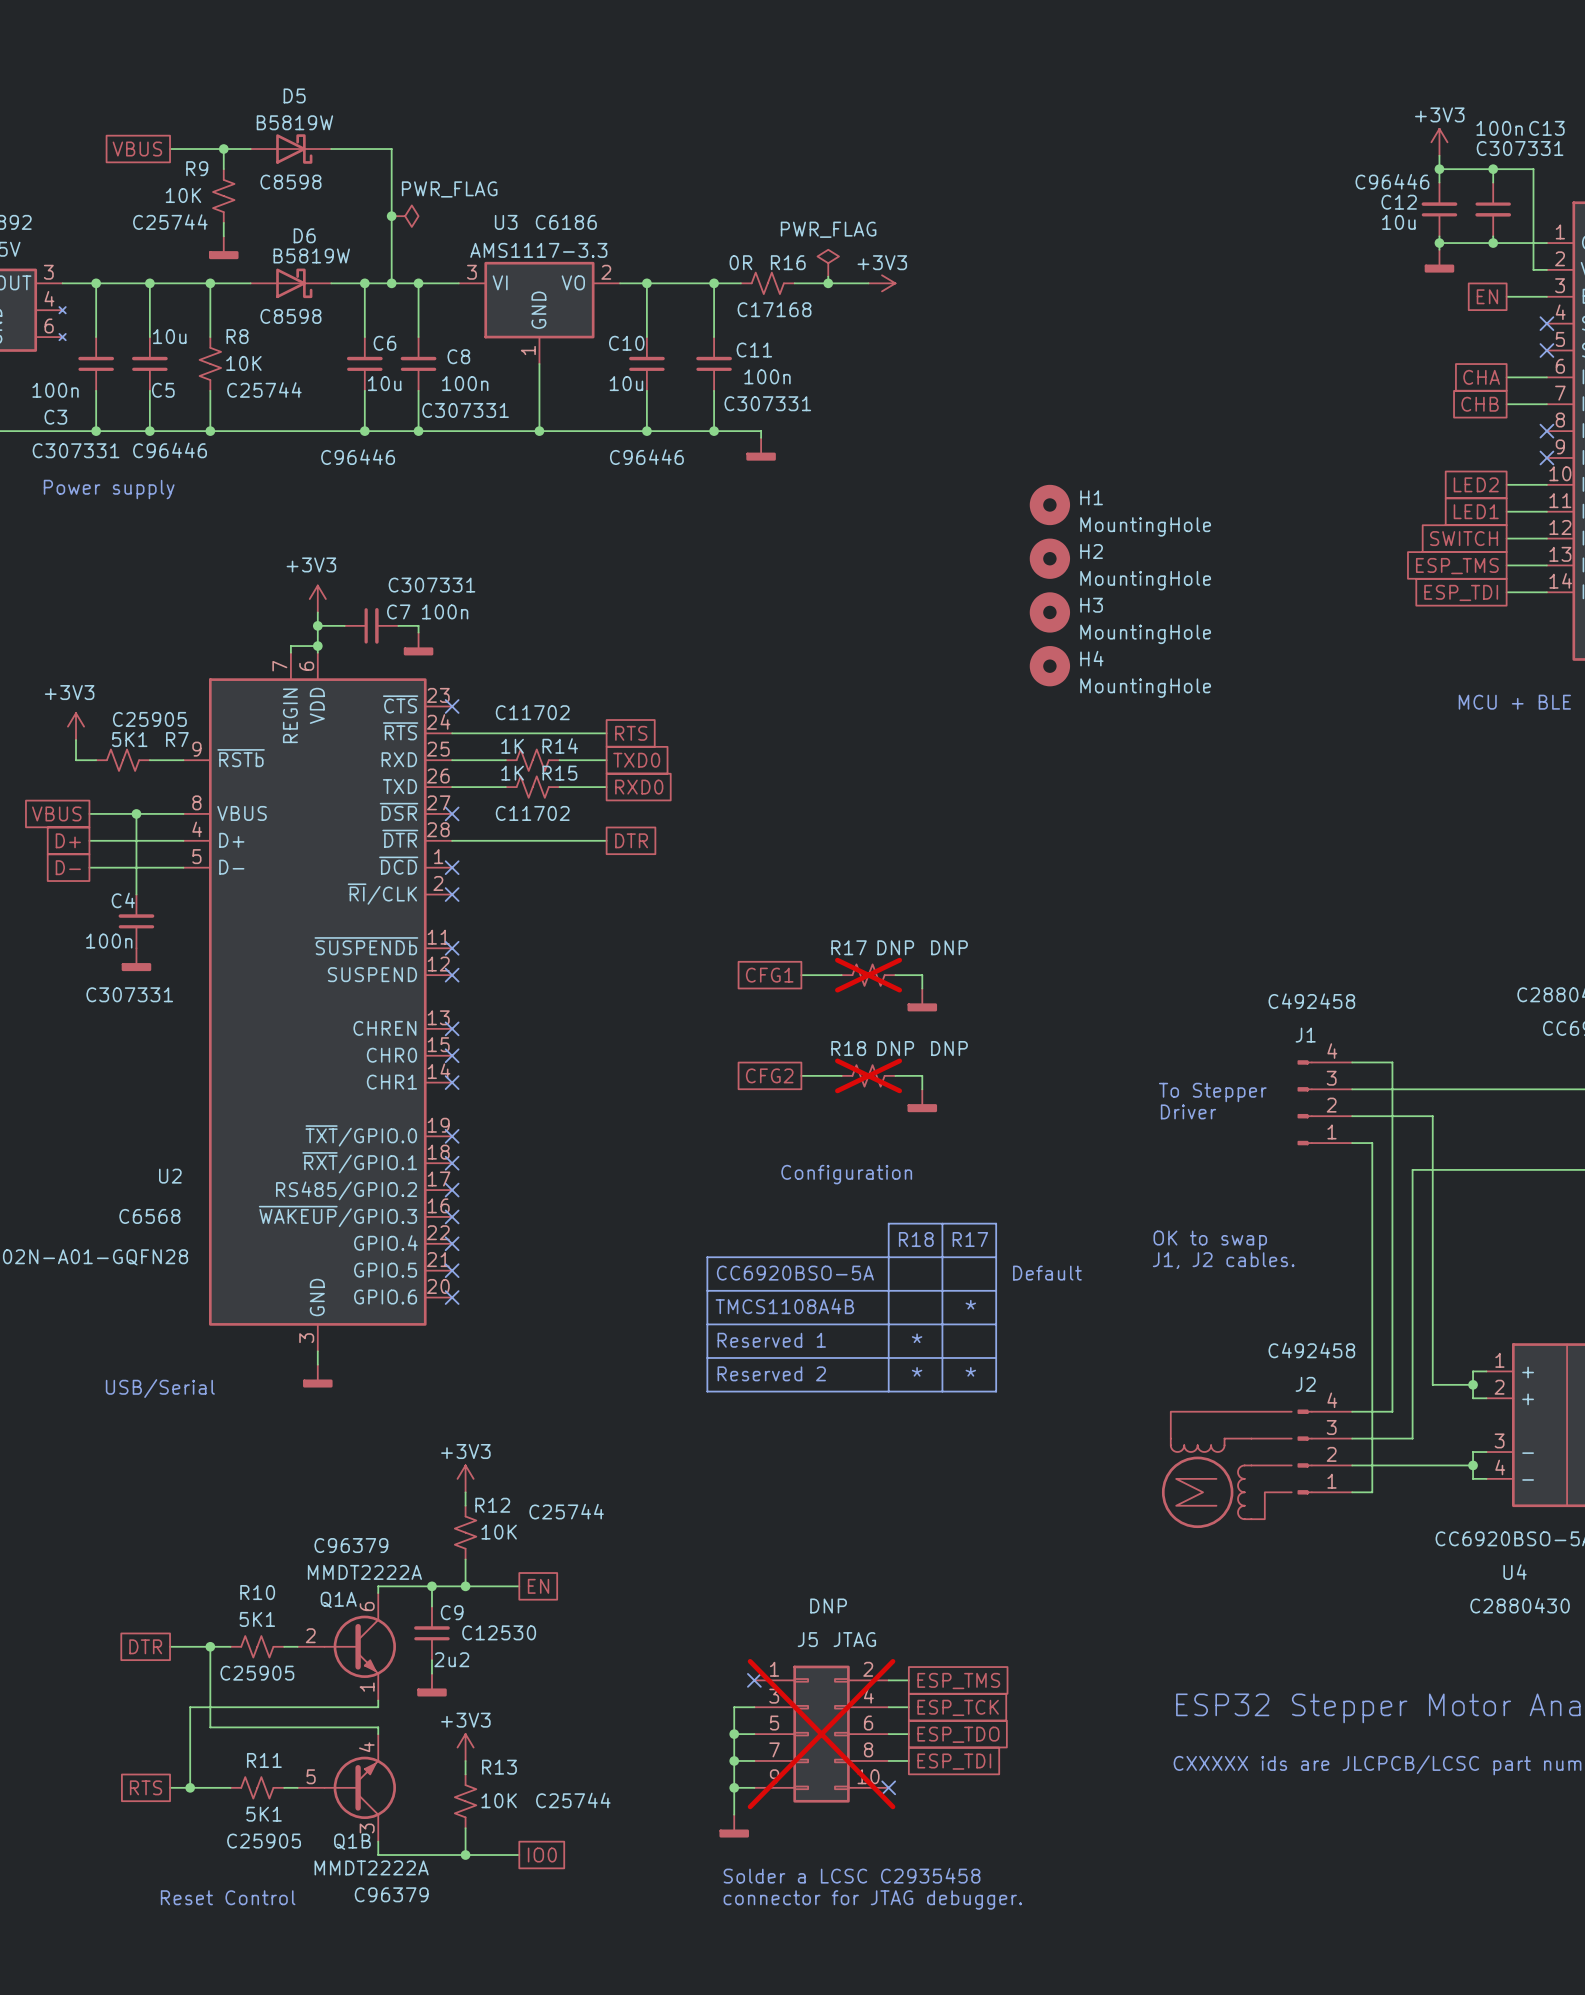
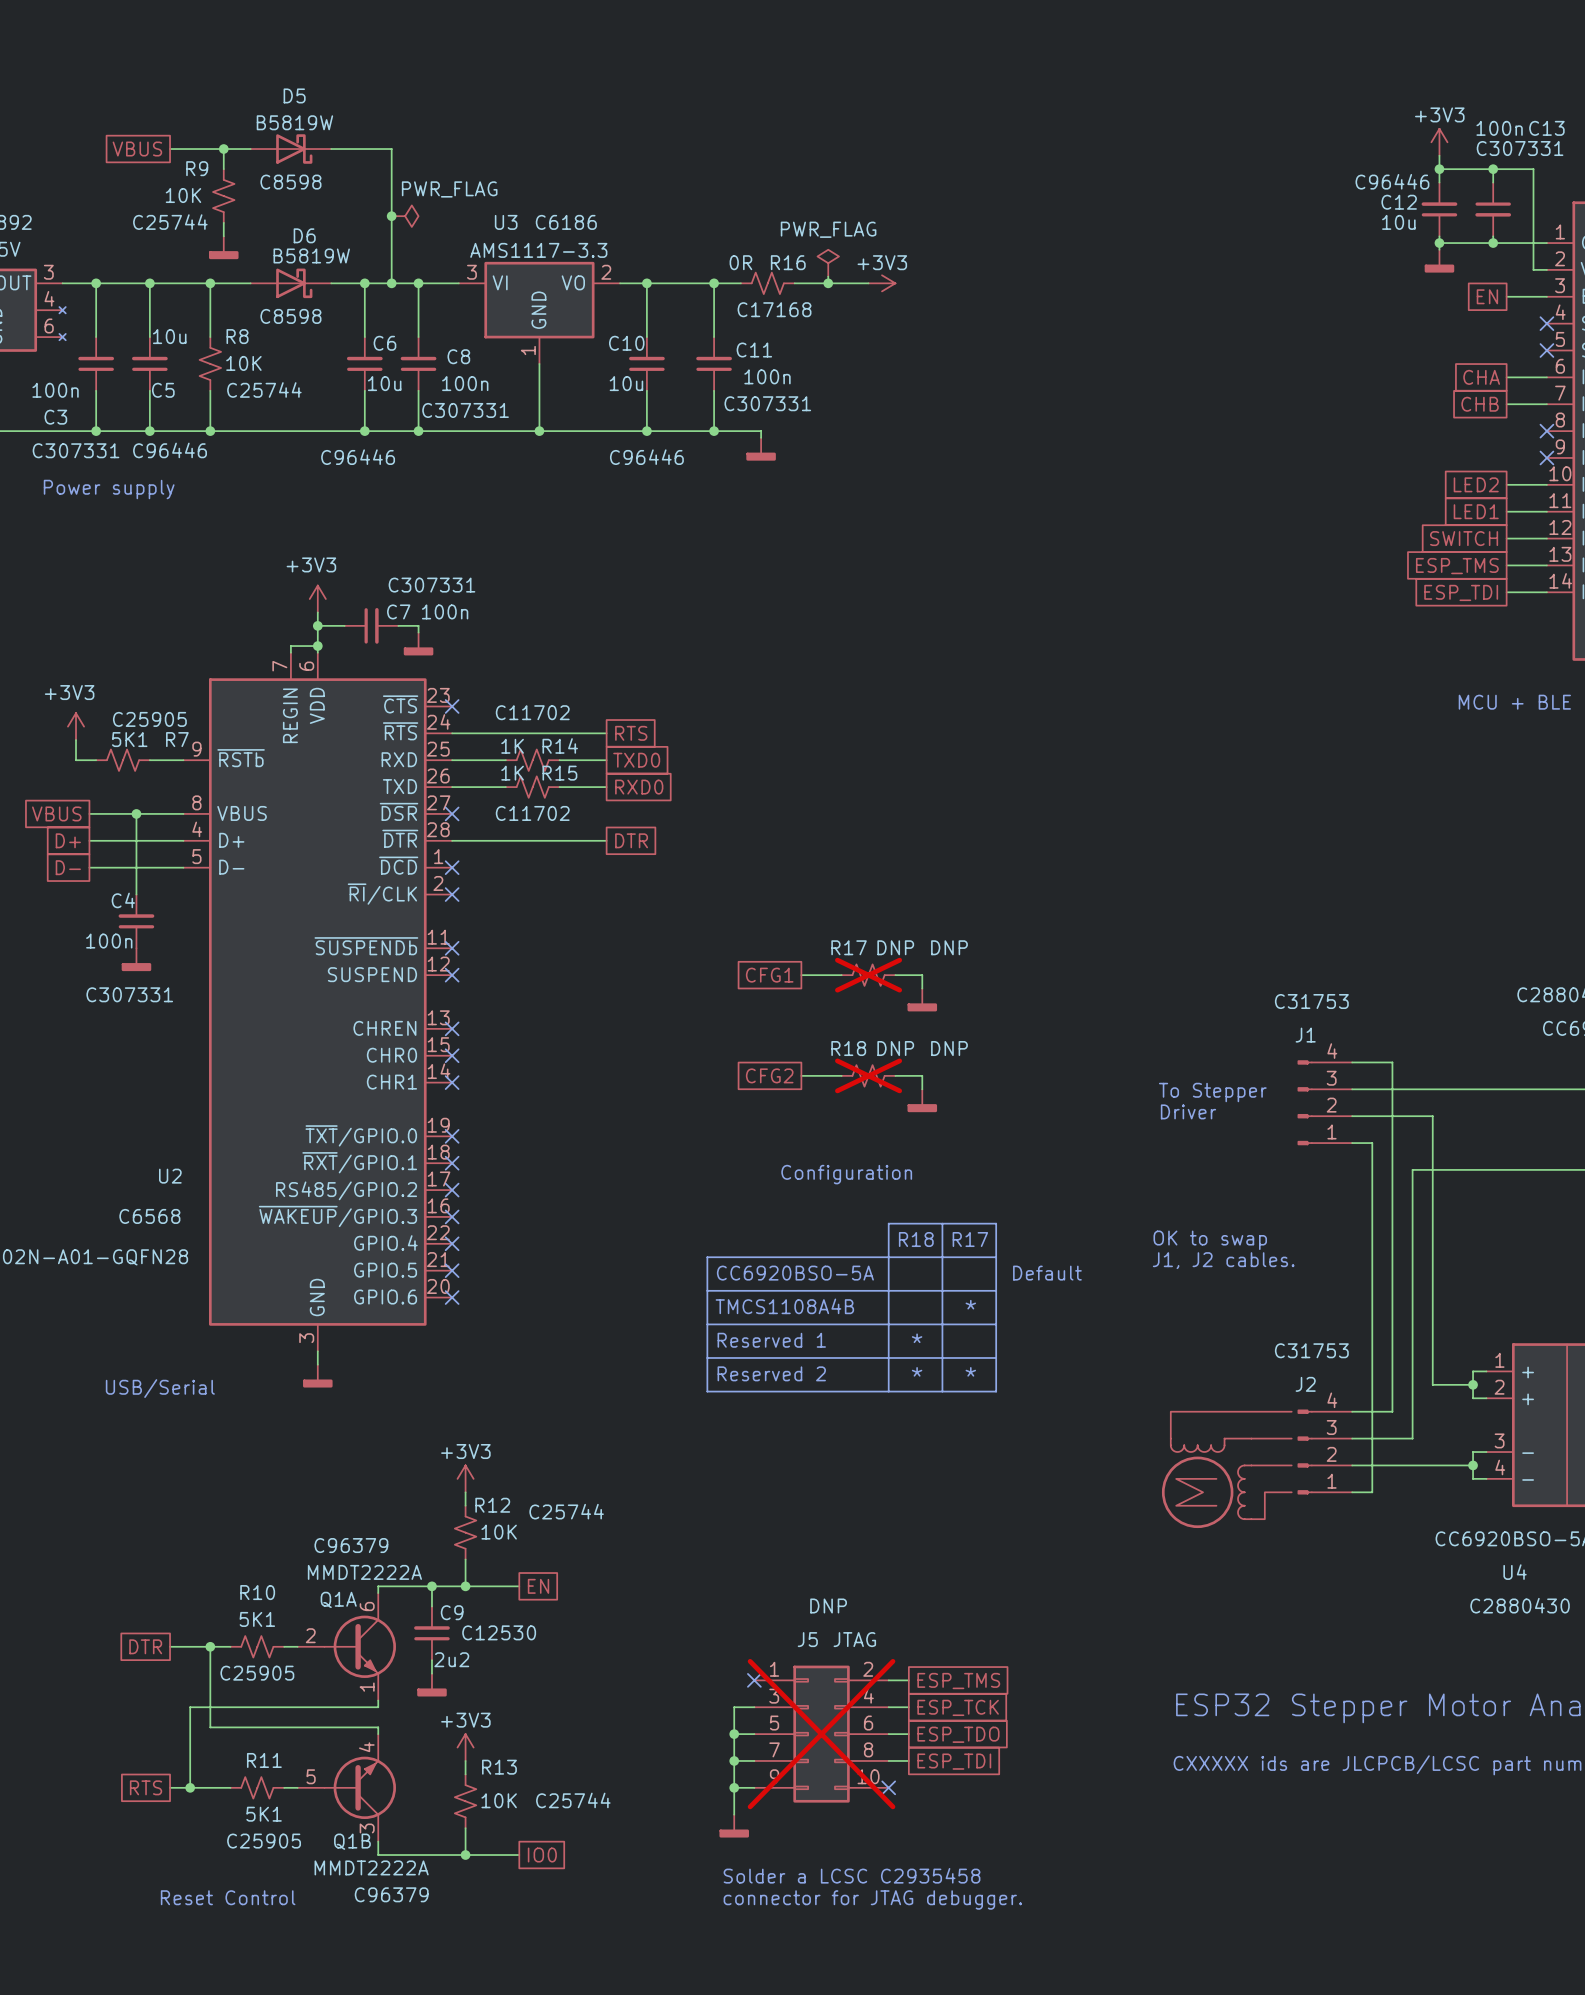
H1: MountingHole (1049, 504) -> none
H2: MountingHole (1049, 558) -> none
H3: MountingHole (1049, 612) -> none
H4: MountingHole (1049, 666) -> none
J1 text: C492458 (1311, 1001) -> C31753 (1311, 1001)
J2 text: C492458 (1311, 1350) -> C31753 (1311, 1350)

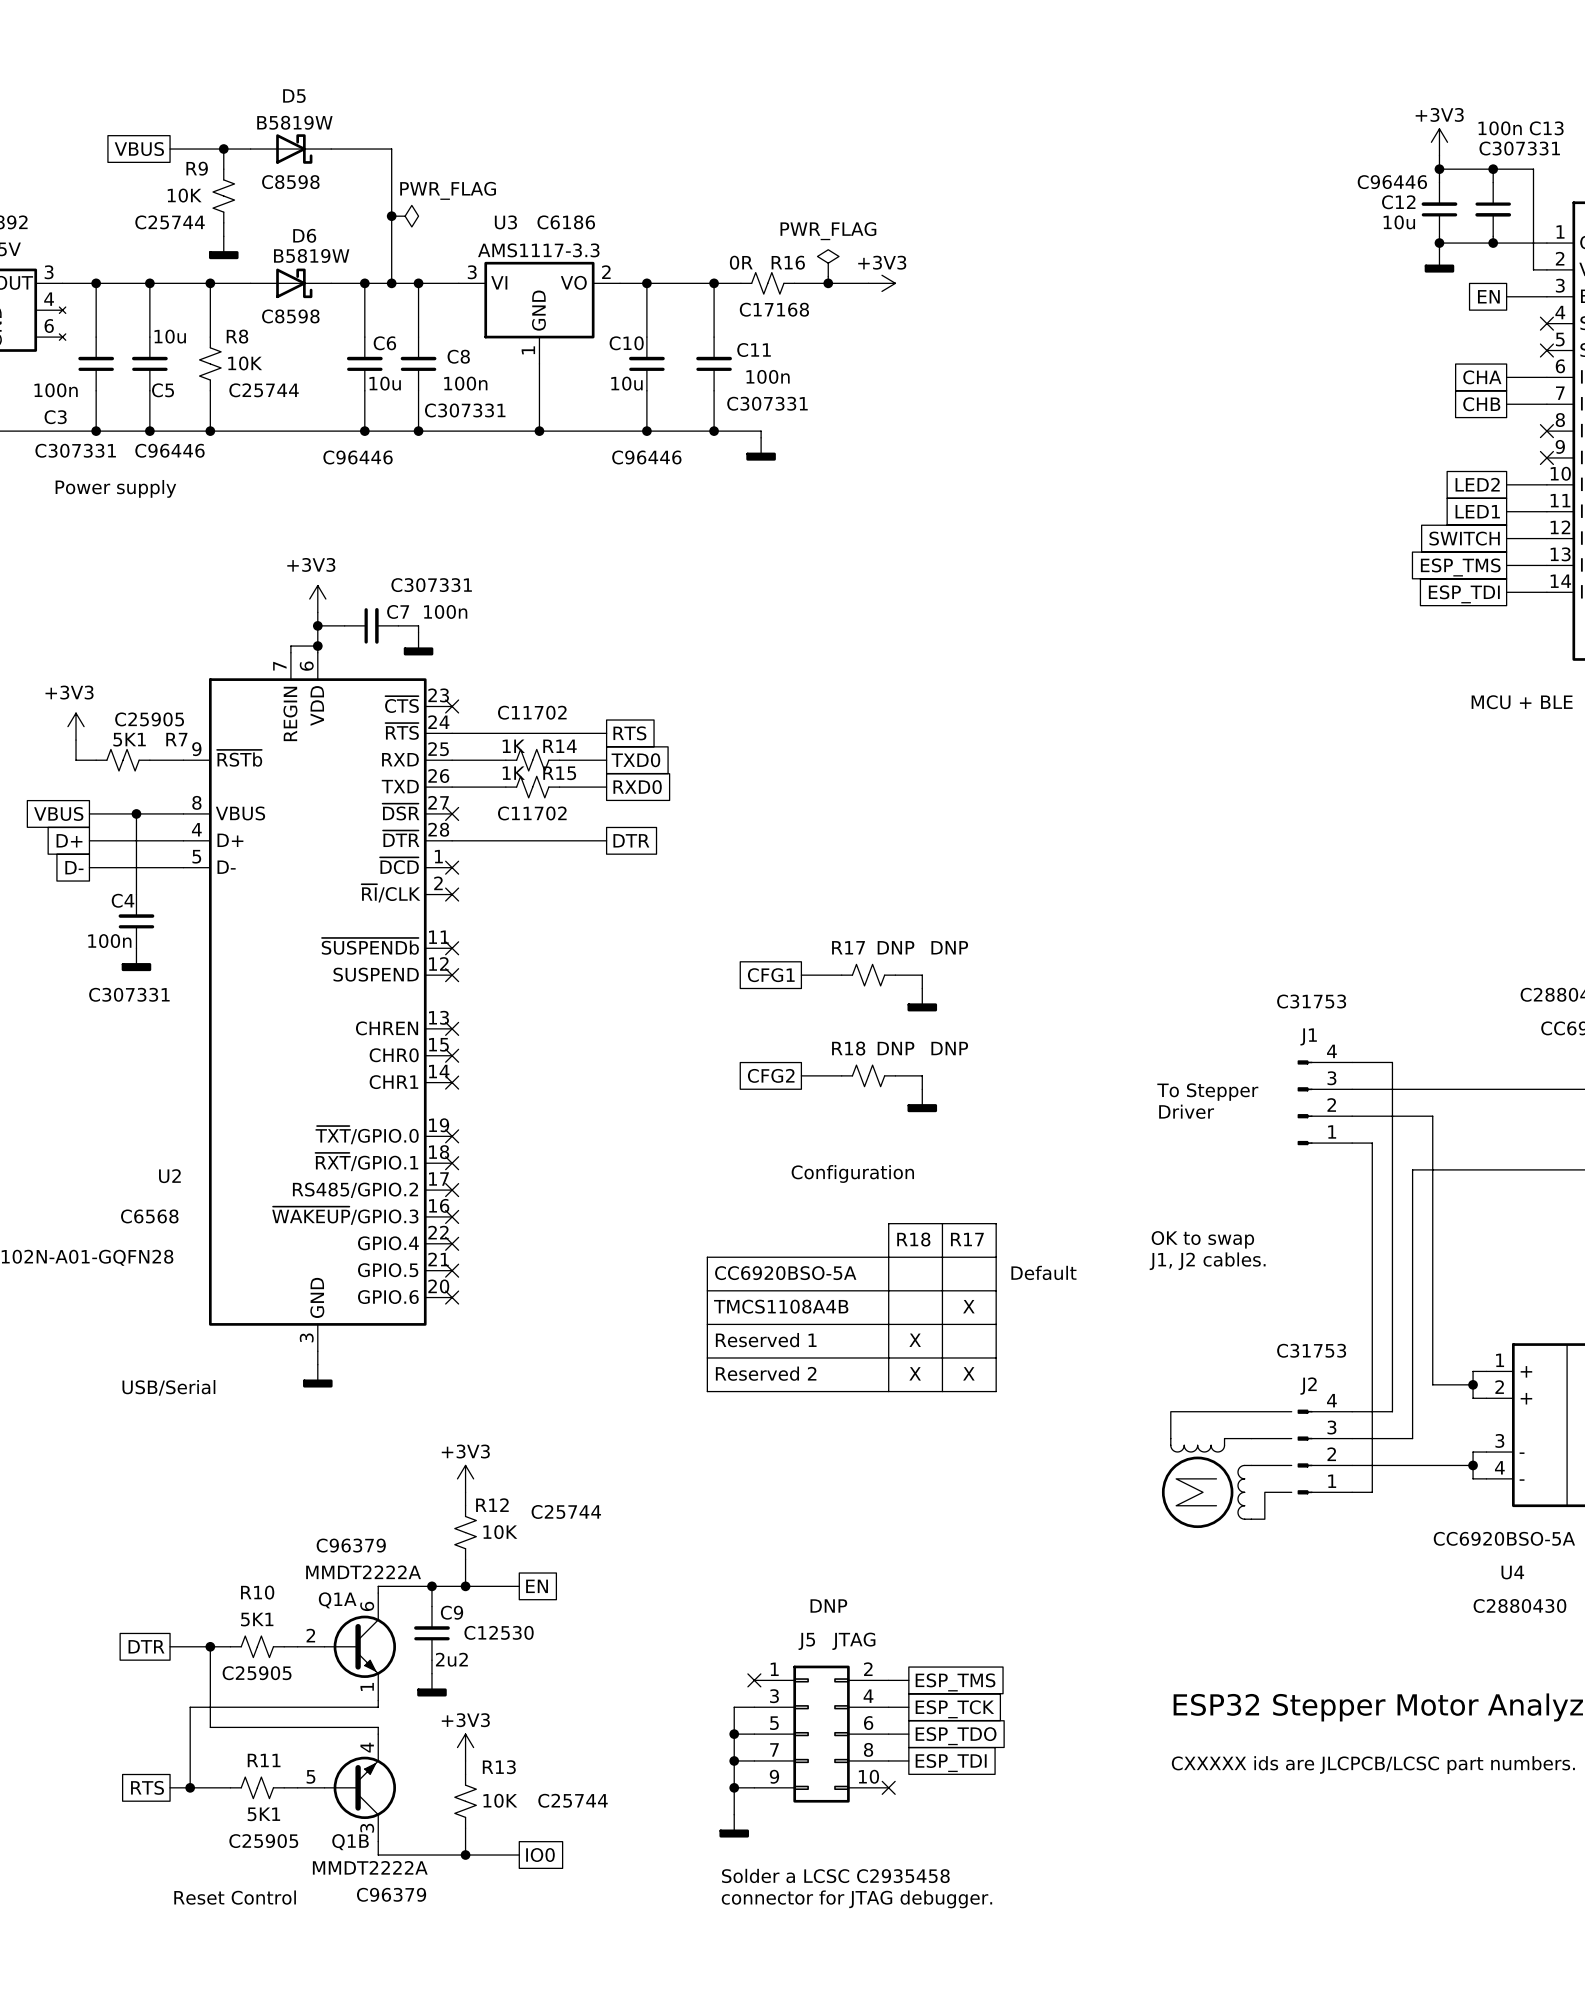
R17 do-not-place cross: (868, 975) -> none
R18 do-not-place cross: (868, 1075) -> none
text: * (970, 1304) -> X (968, 1306)
text: * (917, 1338) -> X (915, 1340)
text: * (917, 1371) -> X (915, 1373)
text: * (970, 1371) -> X (968, 1373)
J5 do-not-place cross: (821, 1734) -> none

